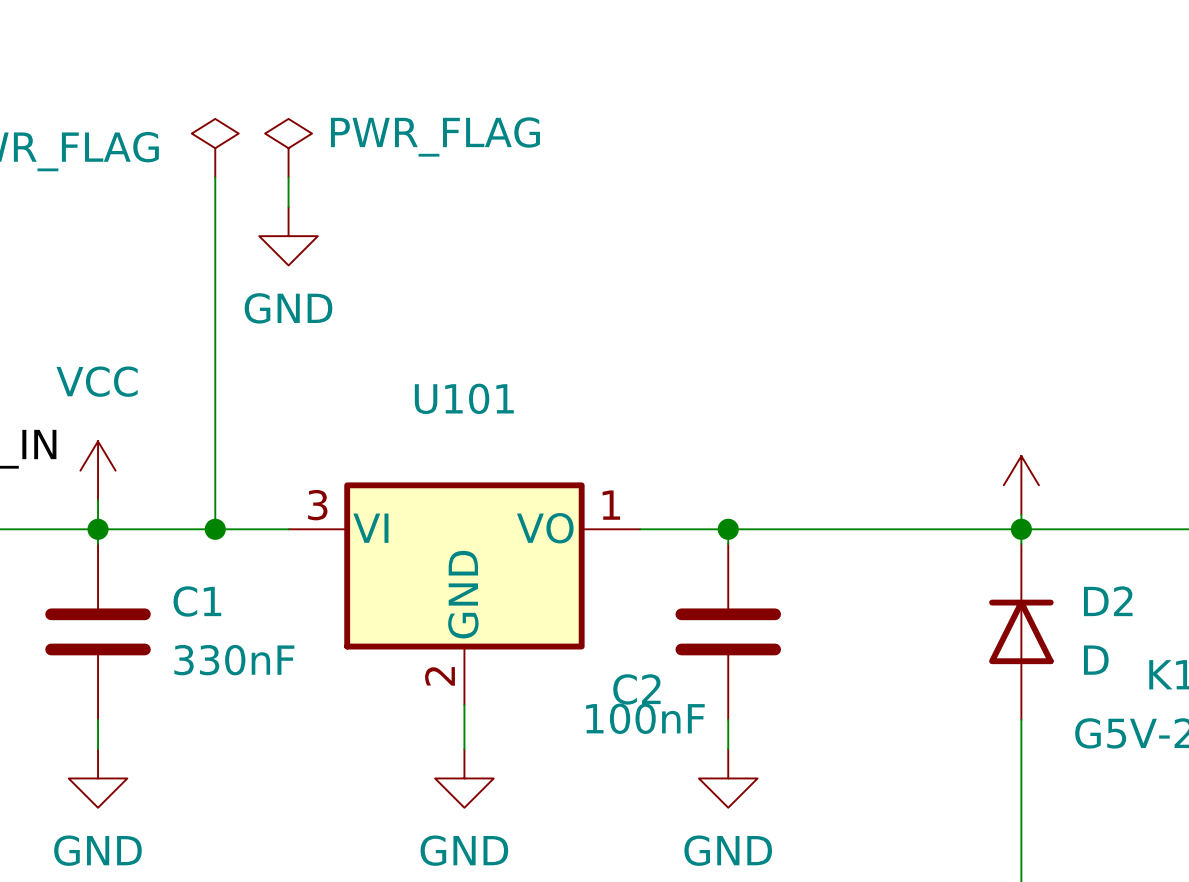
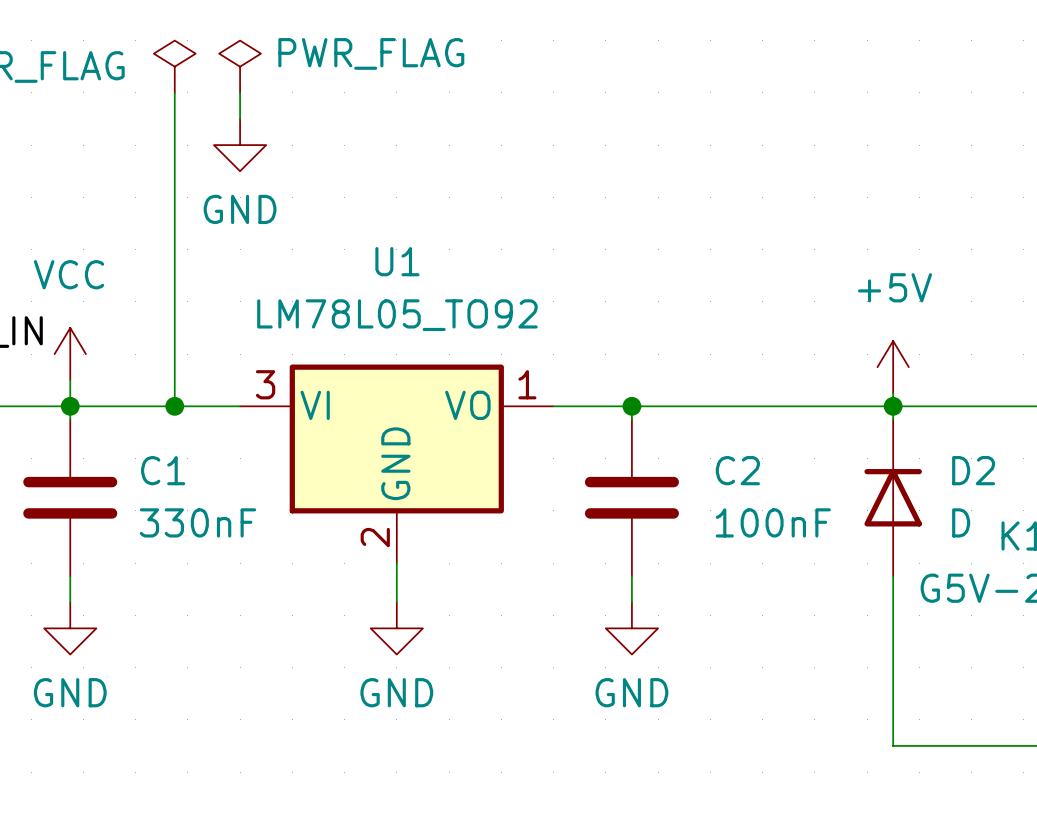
power symbol text: none -> +5V (895, 287)
U101 name: U101 (464, 398) -> U1 (397, 261)
U101 value: none -> LM78L05_TO92 (397, 315)
C2 name position: C2 (636, 689) -> C2 (737, 470)
C2 value position: 100nF (645, 718) -> 100nF (773, 522)

